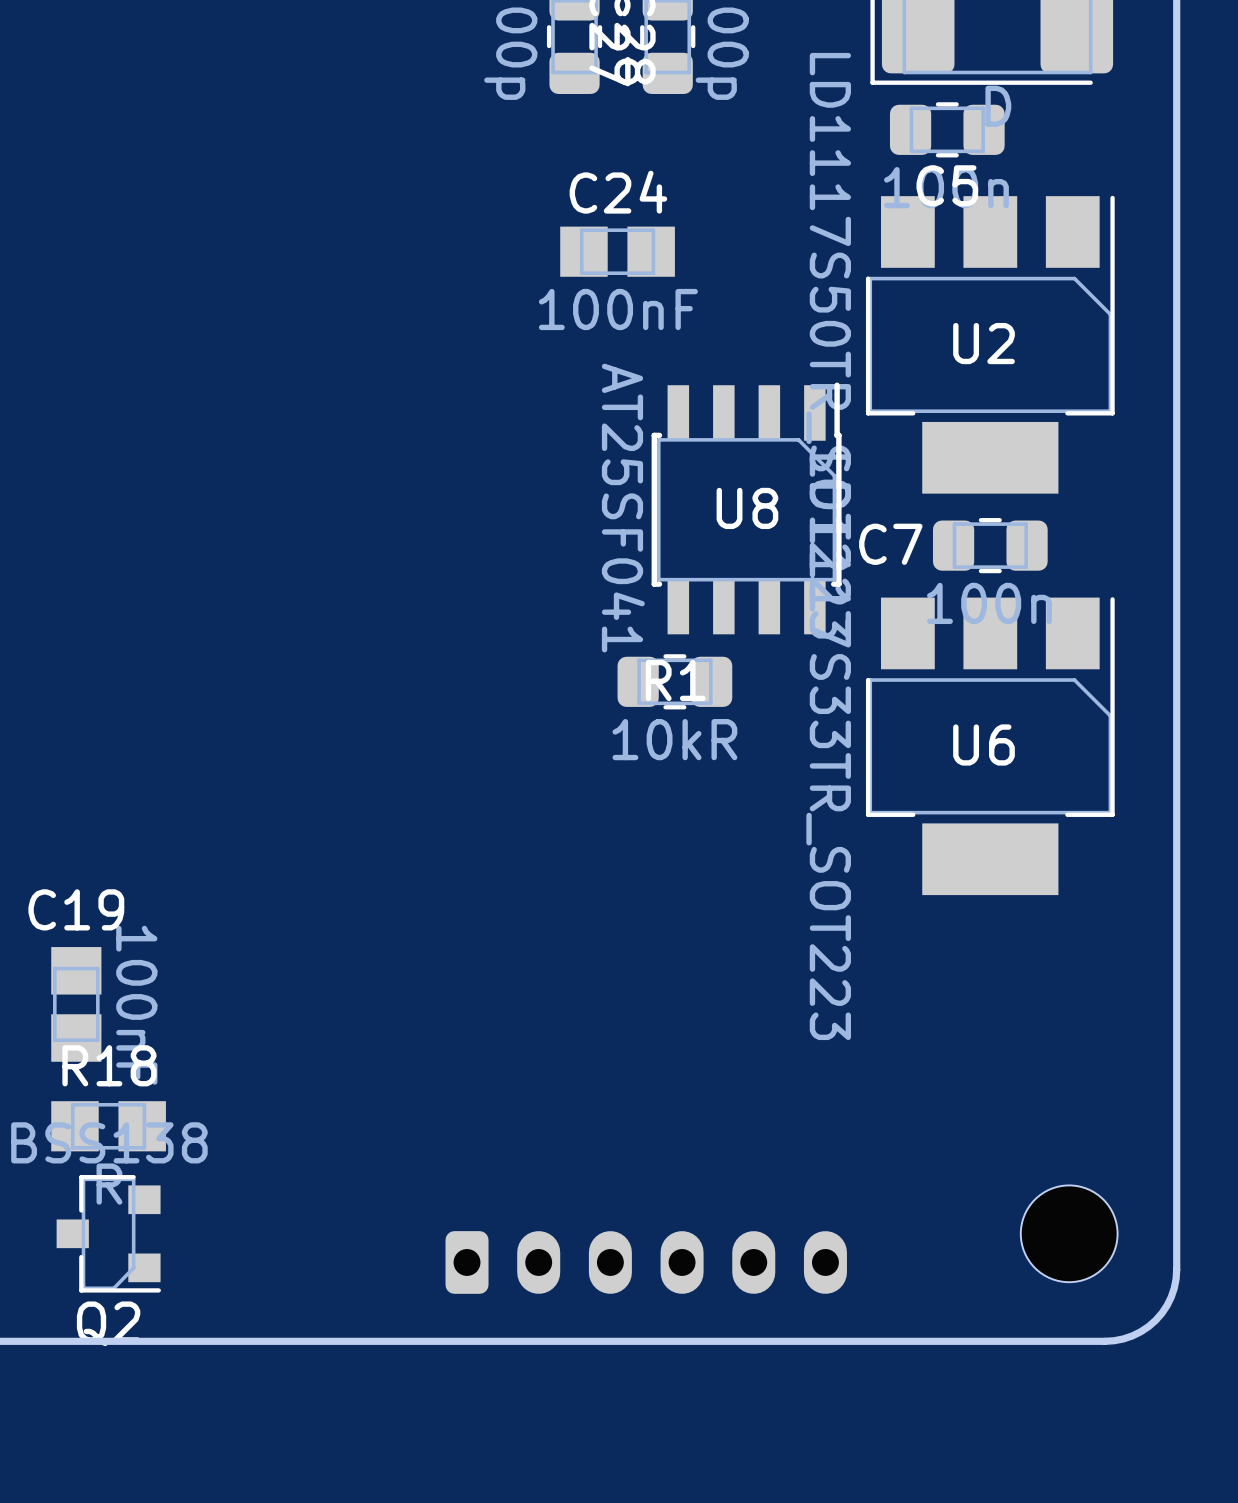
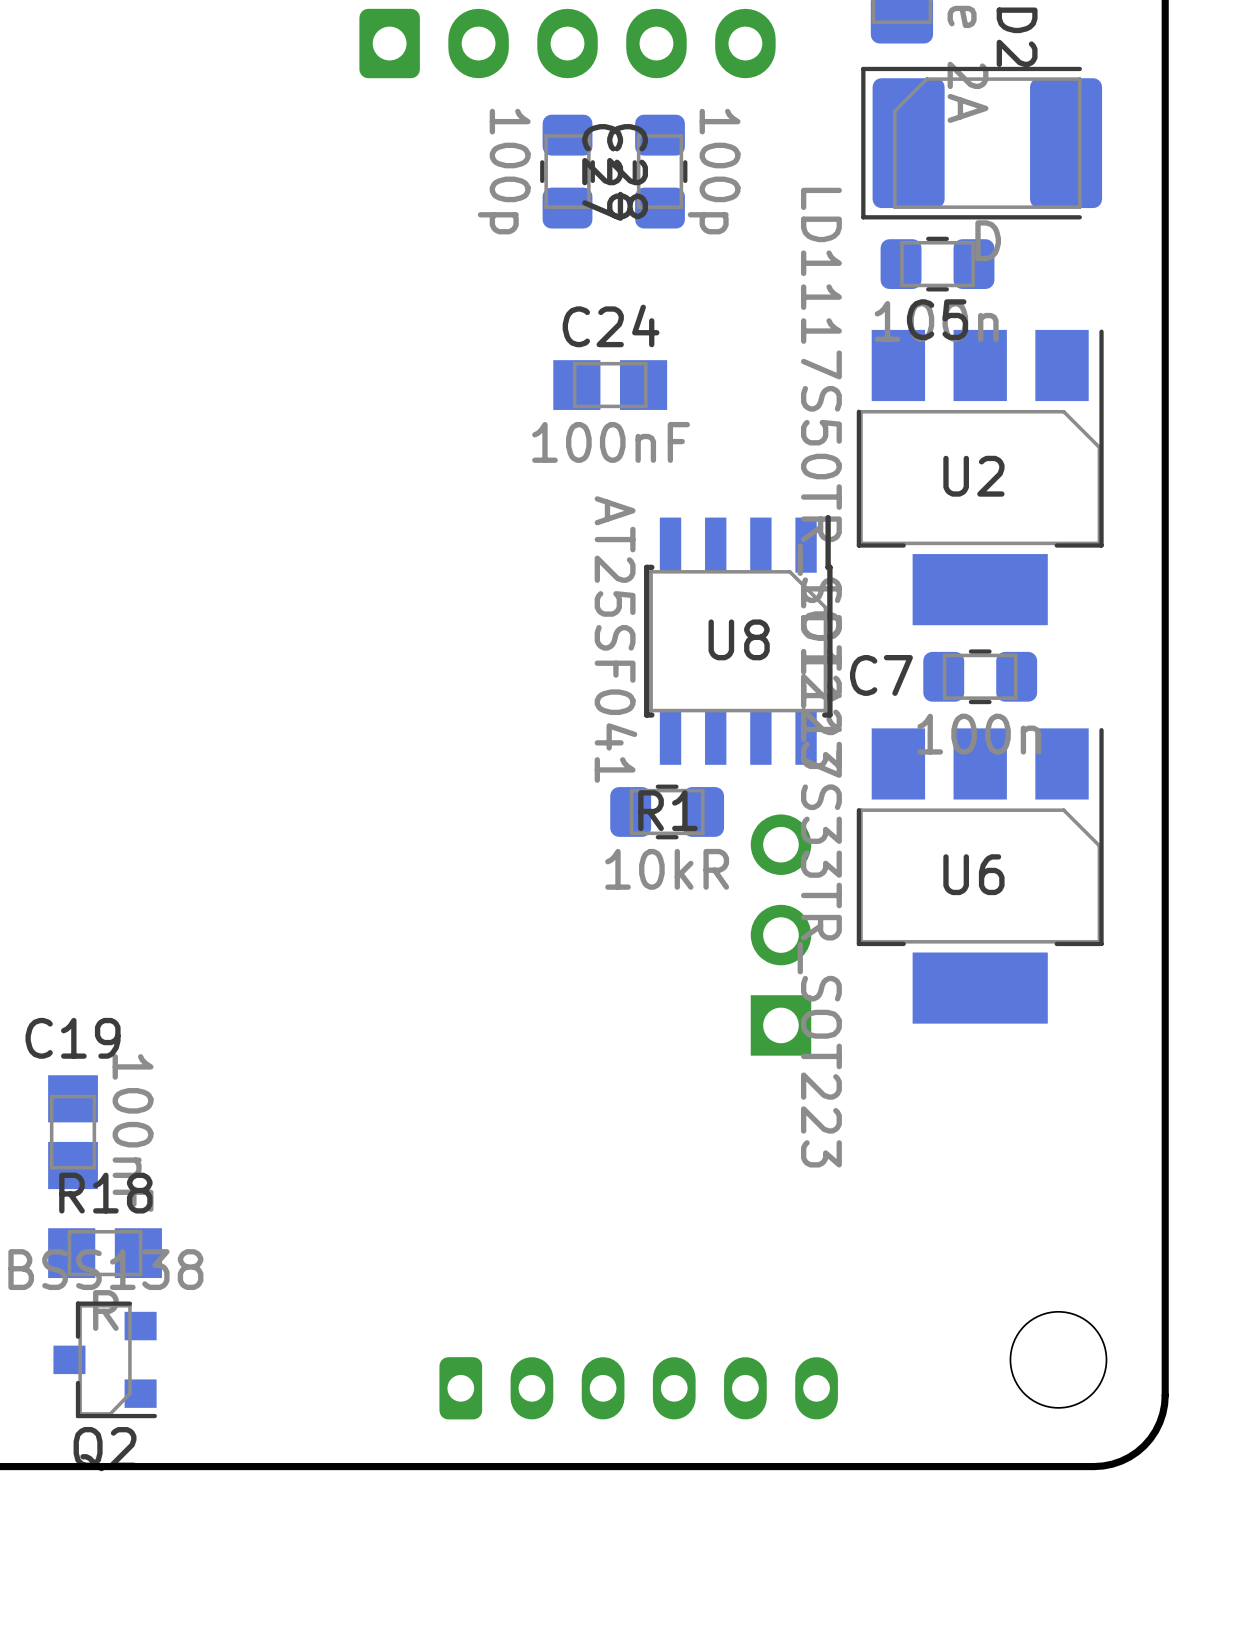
part: none -> (780, 935)

